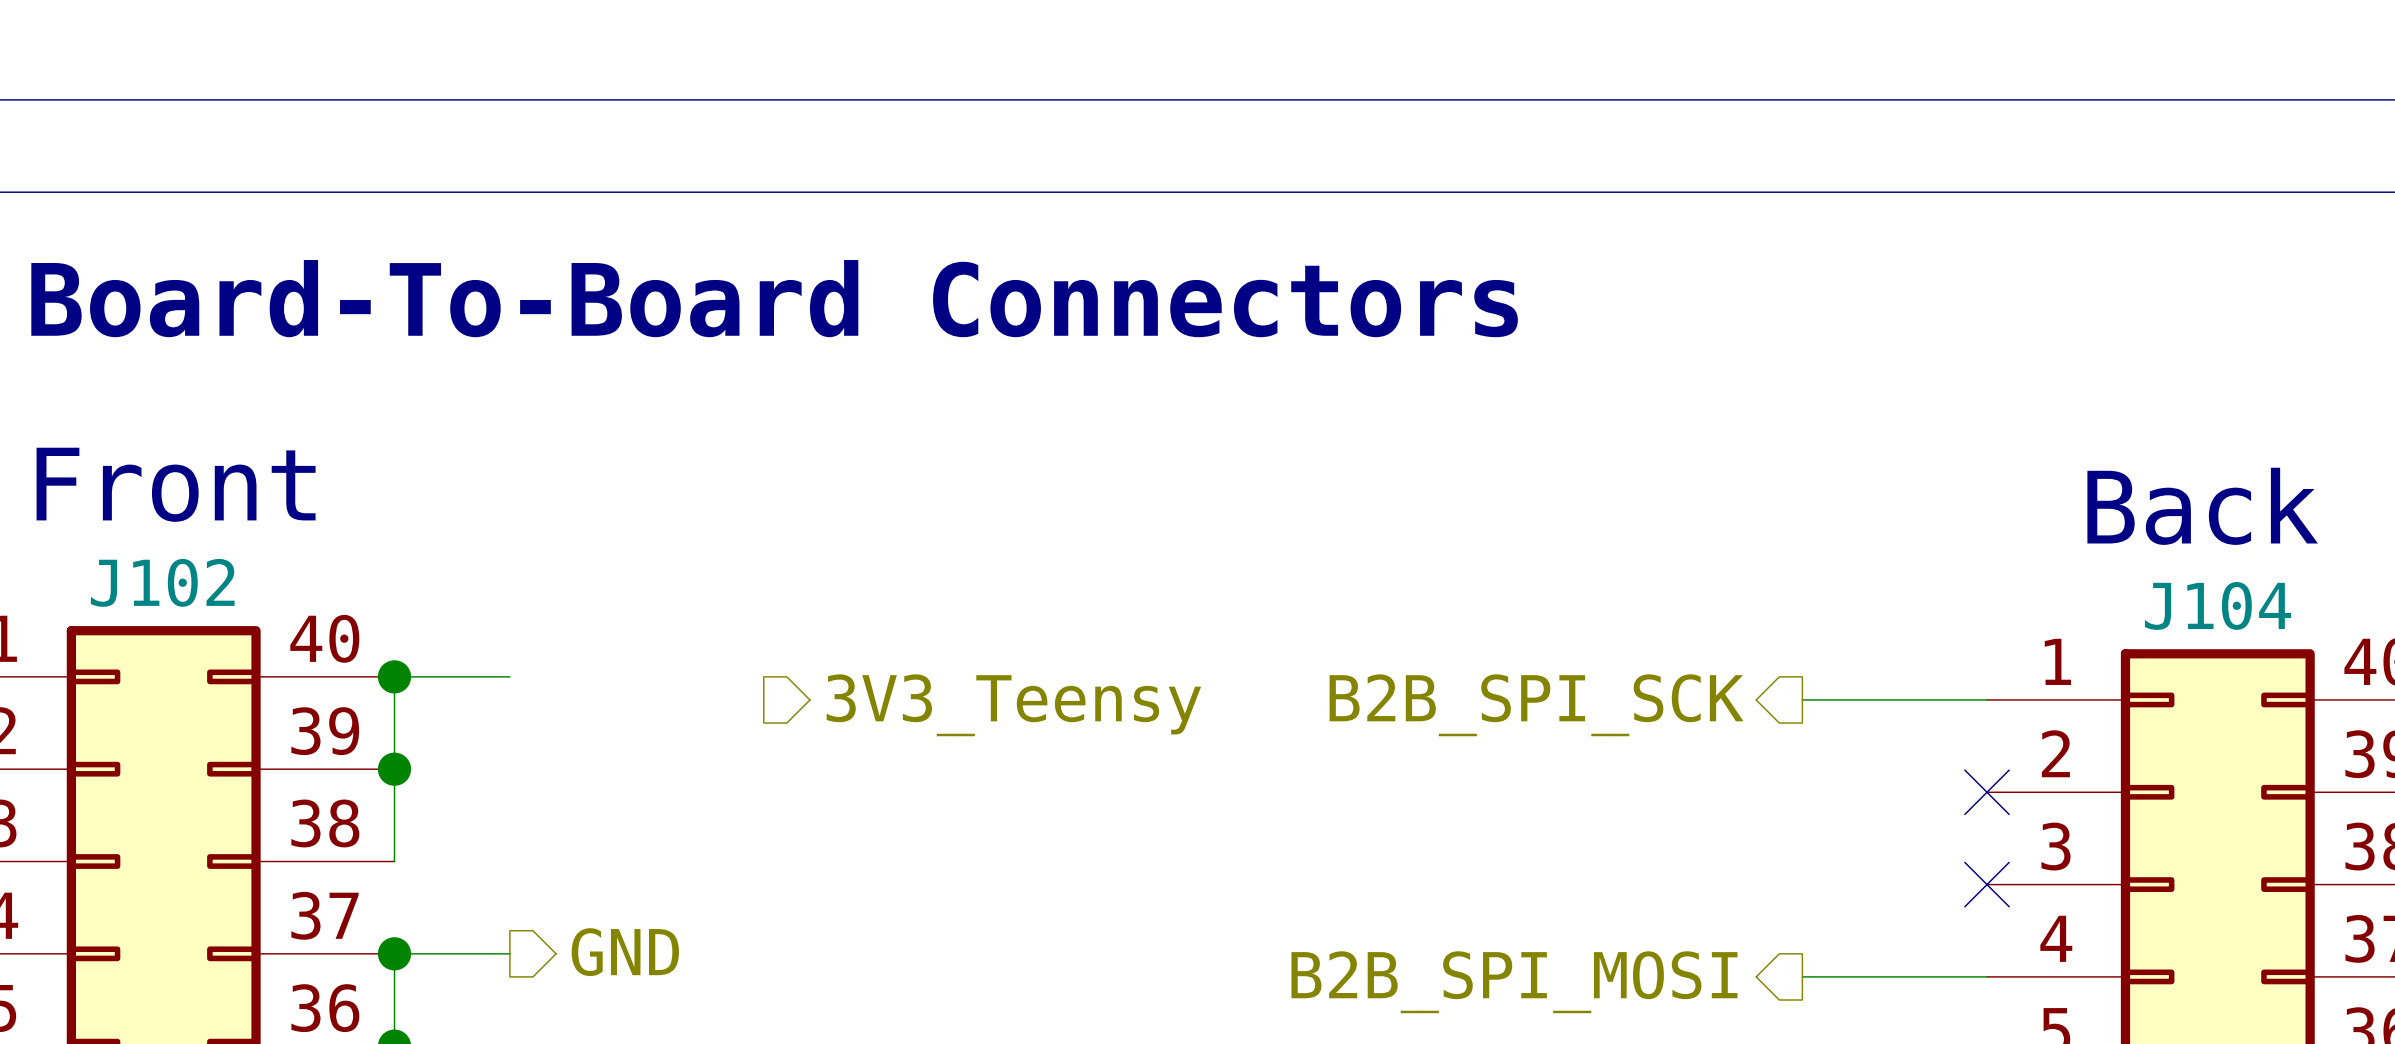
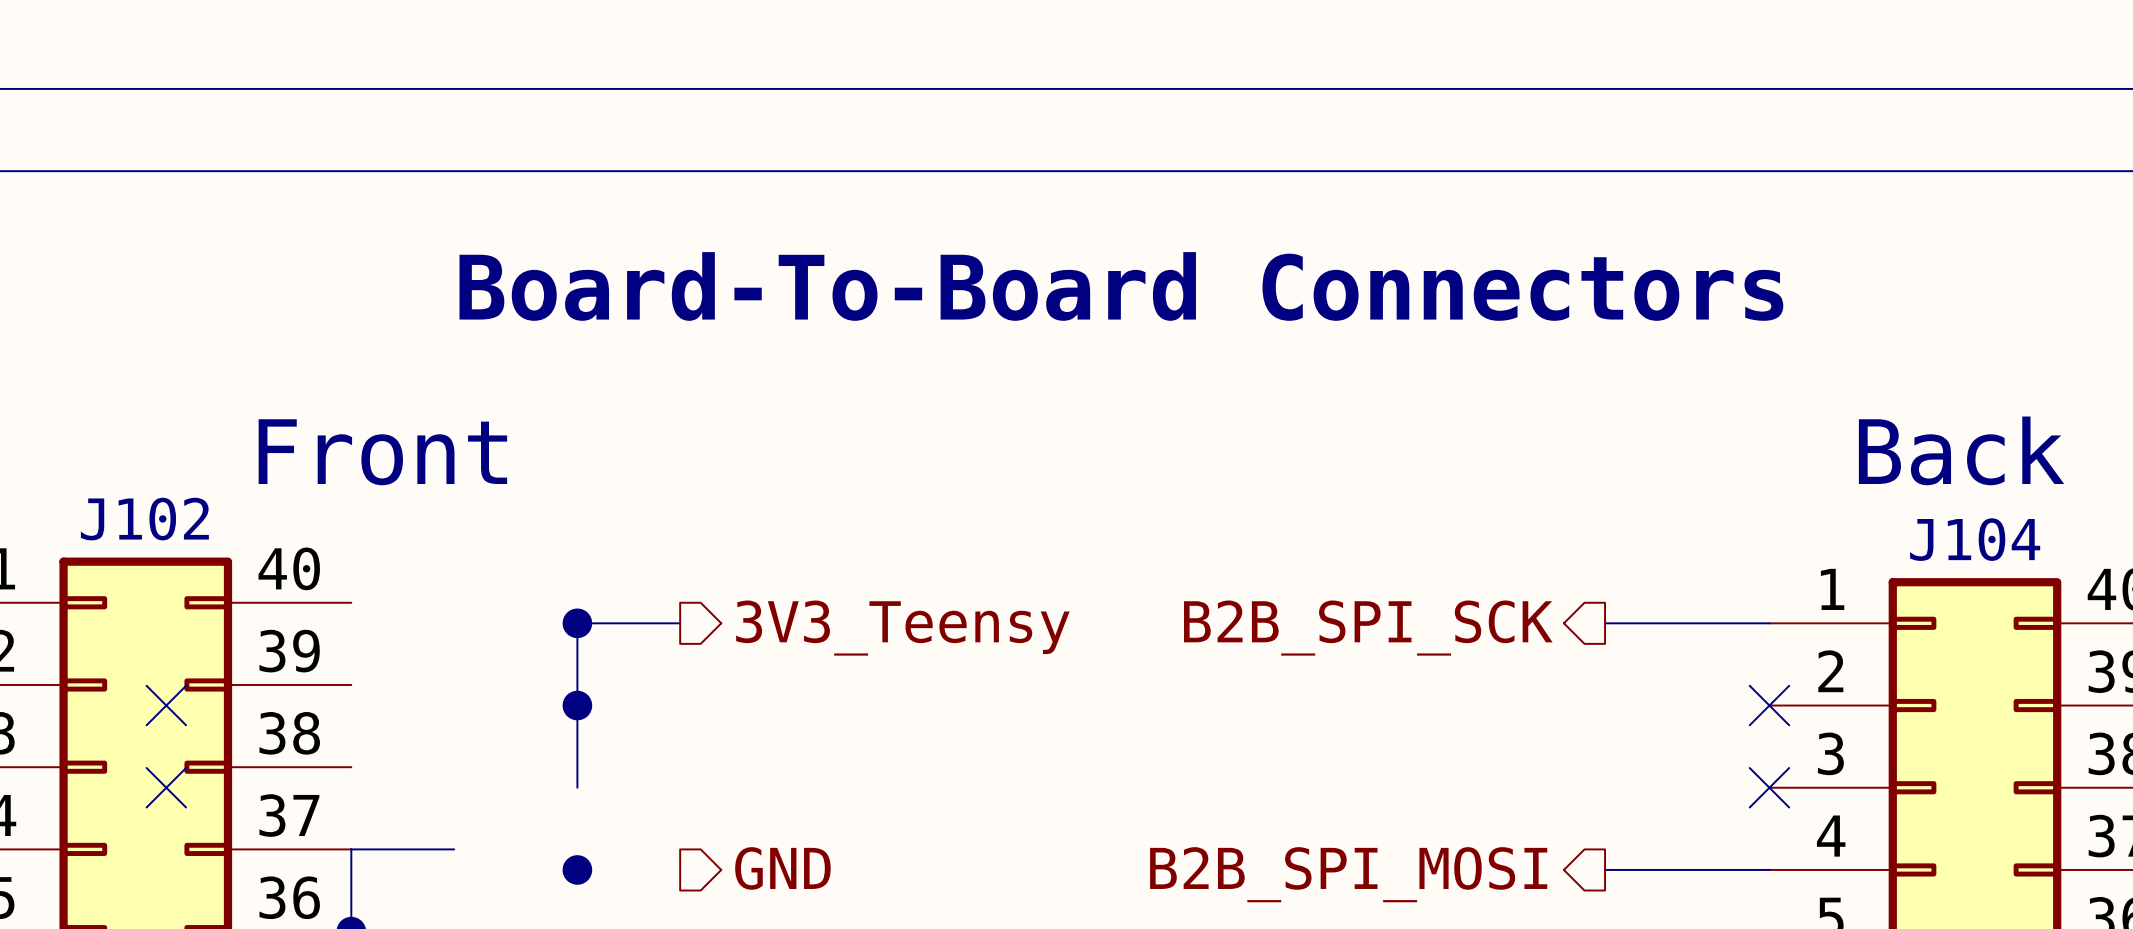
text position: Board-To-Board Connectors (774, 298) -> Board-To-Board Connectors (1121, 286)
text position: Front (176, 484) -> Front (382, 452)
junction: (394, 676) -> none
wire: (509, 676) (394, 676) (394, 861) -> (680, 623) (577, 623) (577, 787)
junction: none -> (577, 623)
junction: (394, 769) -> none
no-connect mark: none -> (166, 705)
junction: none -> (577, 705)
no-connect mark: none -> (166, 787)
hierarchical label position: GND (625, 952) -> GND (782, 868)
junction: (394, 953) -> none
junction: none -> (577, 869)

